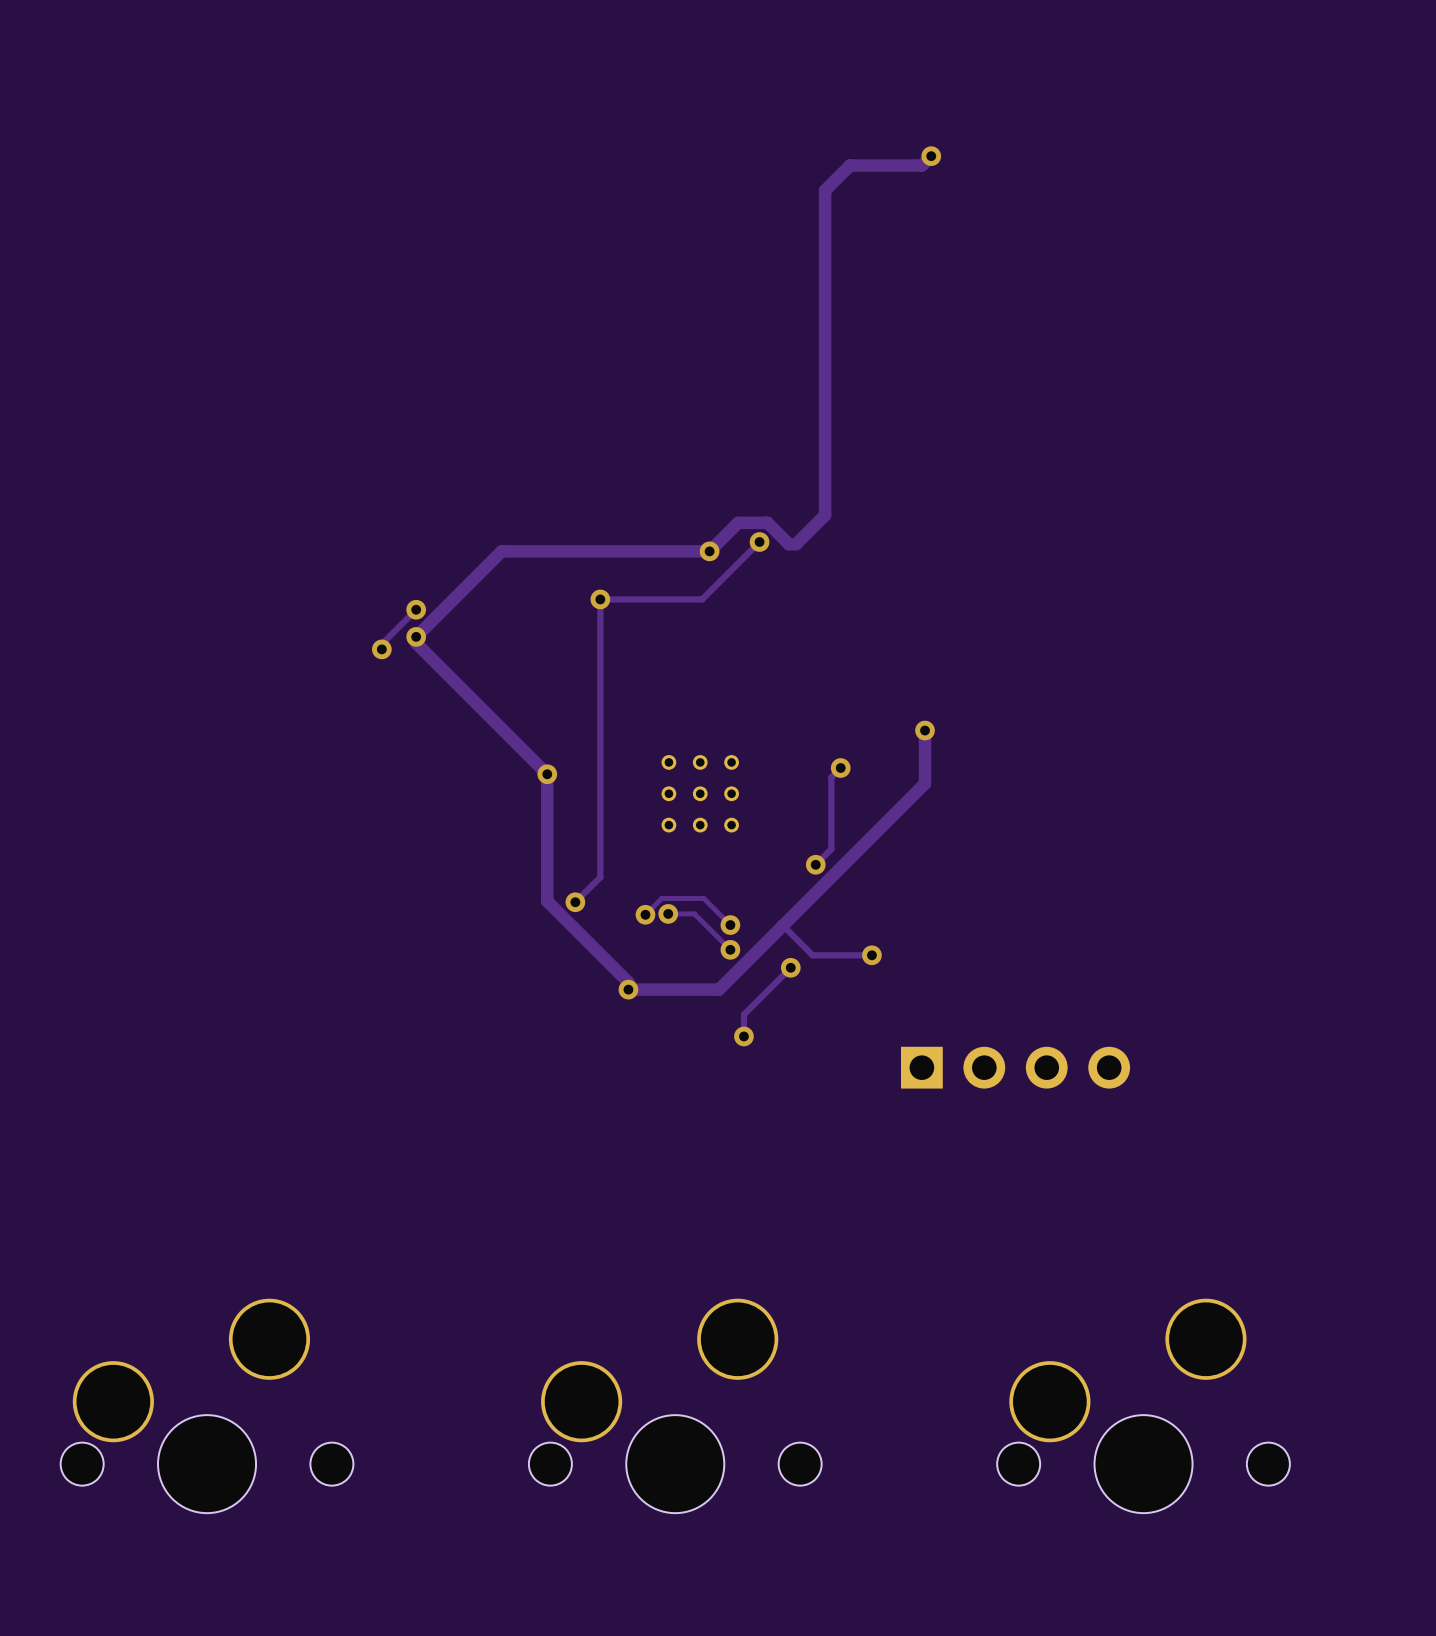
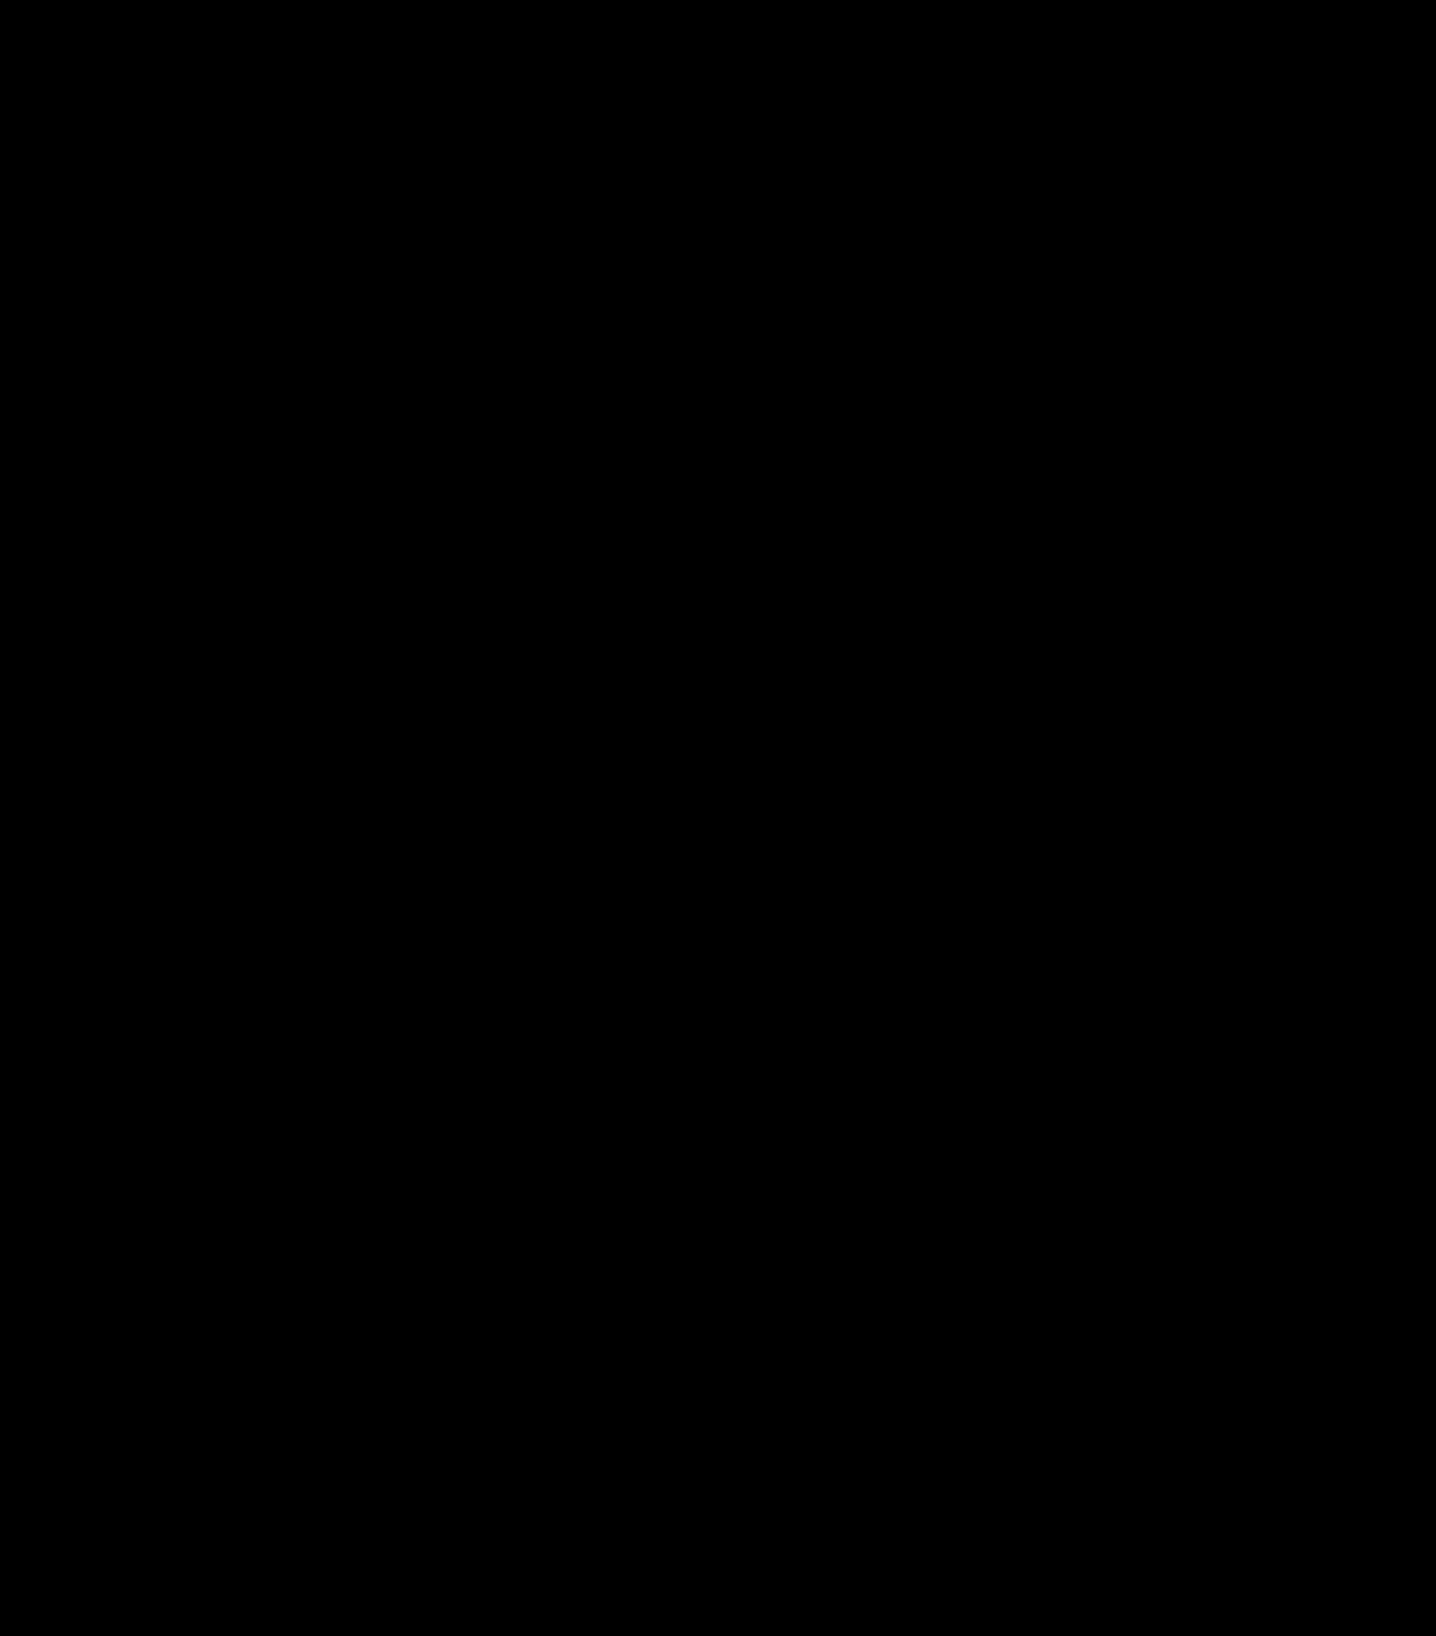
track: (931, 156) (921, 165) (850, 165) (825, 190) (825, 515) (796, 544) (788, 544) (767, 522) (738, 522) (709, 551) (501, 551) (416, 636) (416, 643) (547, 774) (547, 901) (628, 982) (628, 989) (718, 989) (925, 783) (925, 730) -> none
via: (931, 156) -> none
track: (759, 542) (702, 599) (600, 599) (600, 877) (575, 902) -> none
via: (759, 542) -> none
via: (709, 551) -> none
via: (600, 599) -> none
track: (416, 609) (381, 644) (381, 649) -> none
via: (416, 609) -> none
via: (416, 636) -> none
via: (381, 649) -> none
via: (925, 730) -> none
track: (840, 768) (831, 777) (831, 849) (815, 864) -> none
via: (840, 768) -> none
via: (547, 774) -> none
part: (700, 793) -> none
via: (815, 864) -> none
via: (575, 902) -> none
track: (668, 913) (694, 913) (730, 949) -> none
via: (668, 913) -> none
track: (645, 914) (661, 898) (703, 898) (730, 925) -> none
via: (645, 914) -> none
via: (730, 925) -> none
track: (782, 925) (812, 955) (871, 955) -> none
via: (730, 949) -> none
via: (871, 955) -> none
track: (790, 967) (743, 1014) (743, 1036) -> none
via: (790, 967) -> none
via: (628, 989) -> none
via: (743, 1036) -> none
part: (1015, 1067) -> none
part: (207, 1405) -> none
part: (675, 1405) -> none
part: (1143, 1405) -> none

